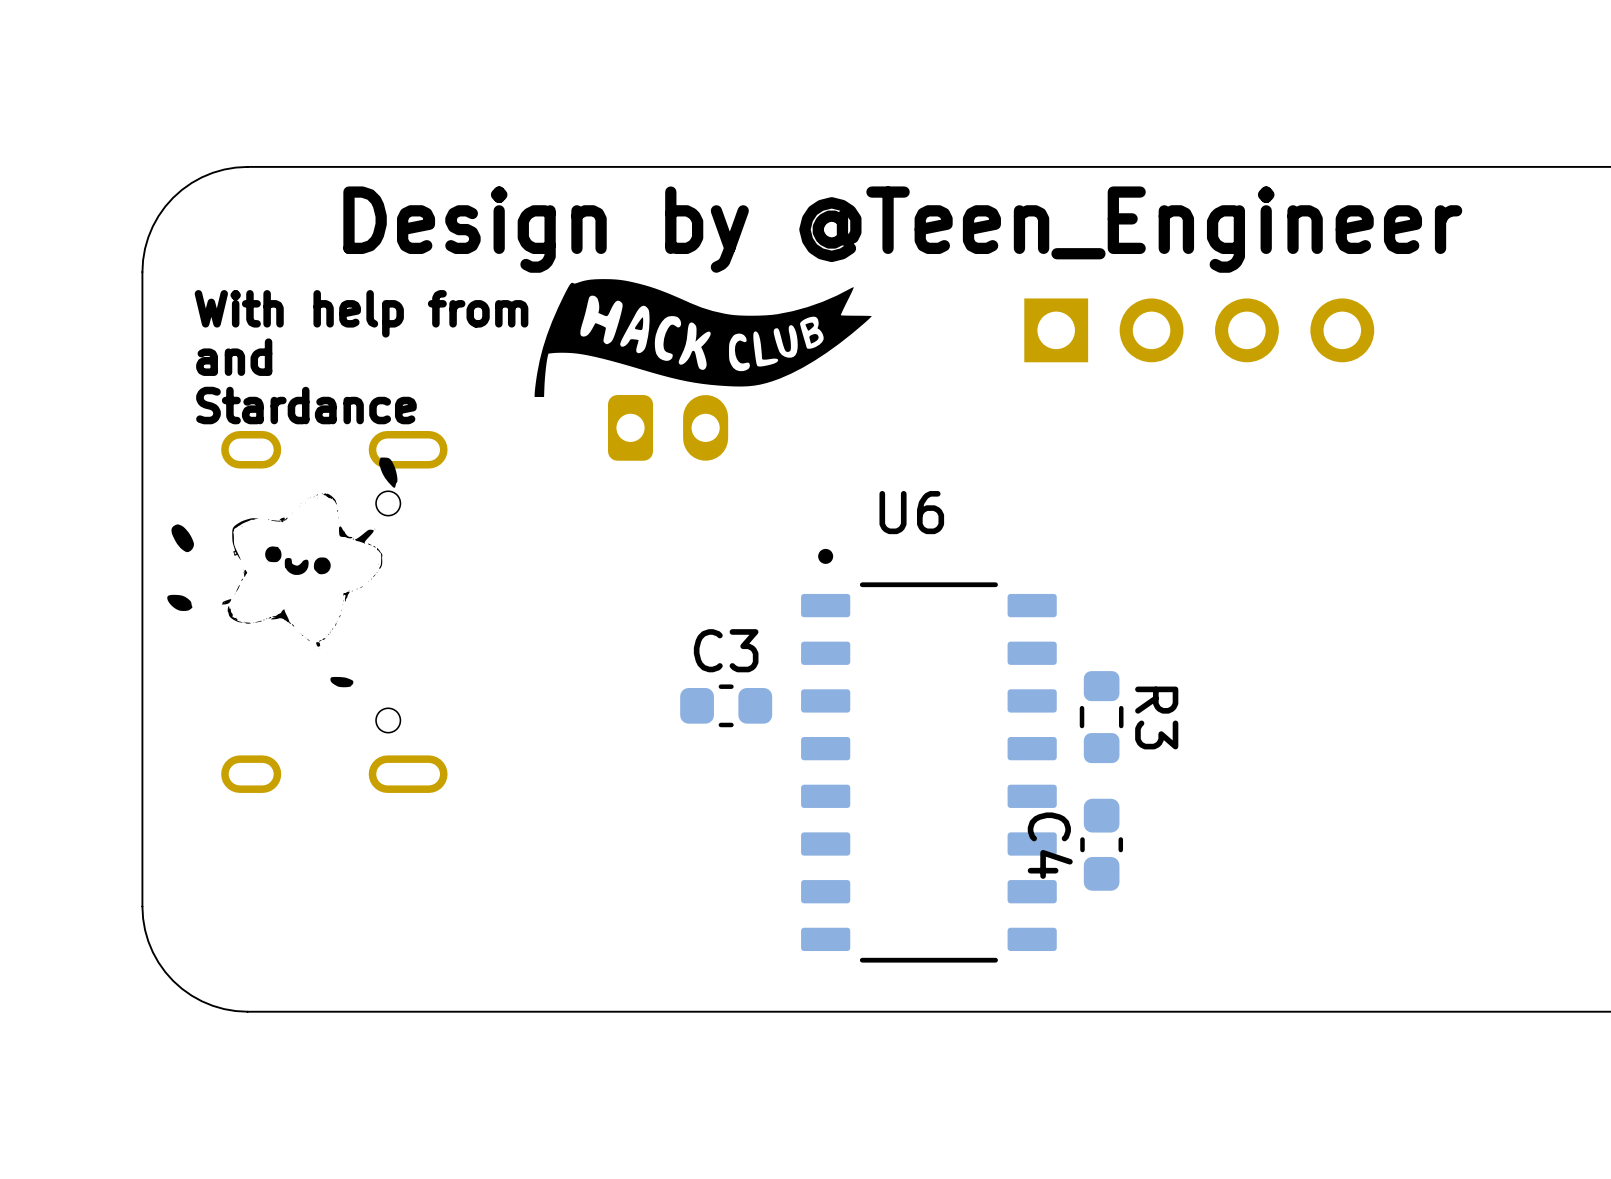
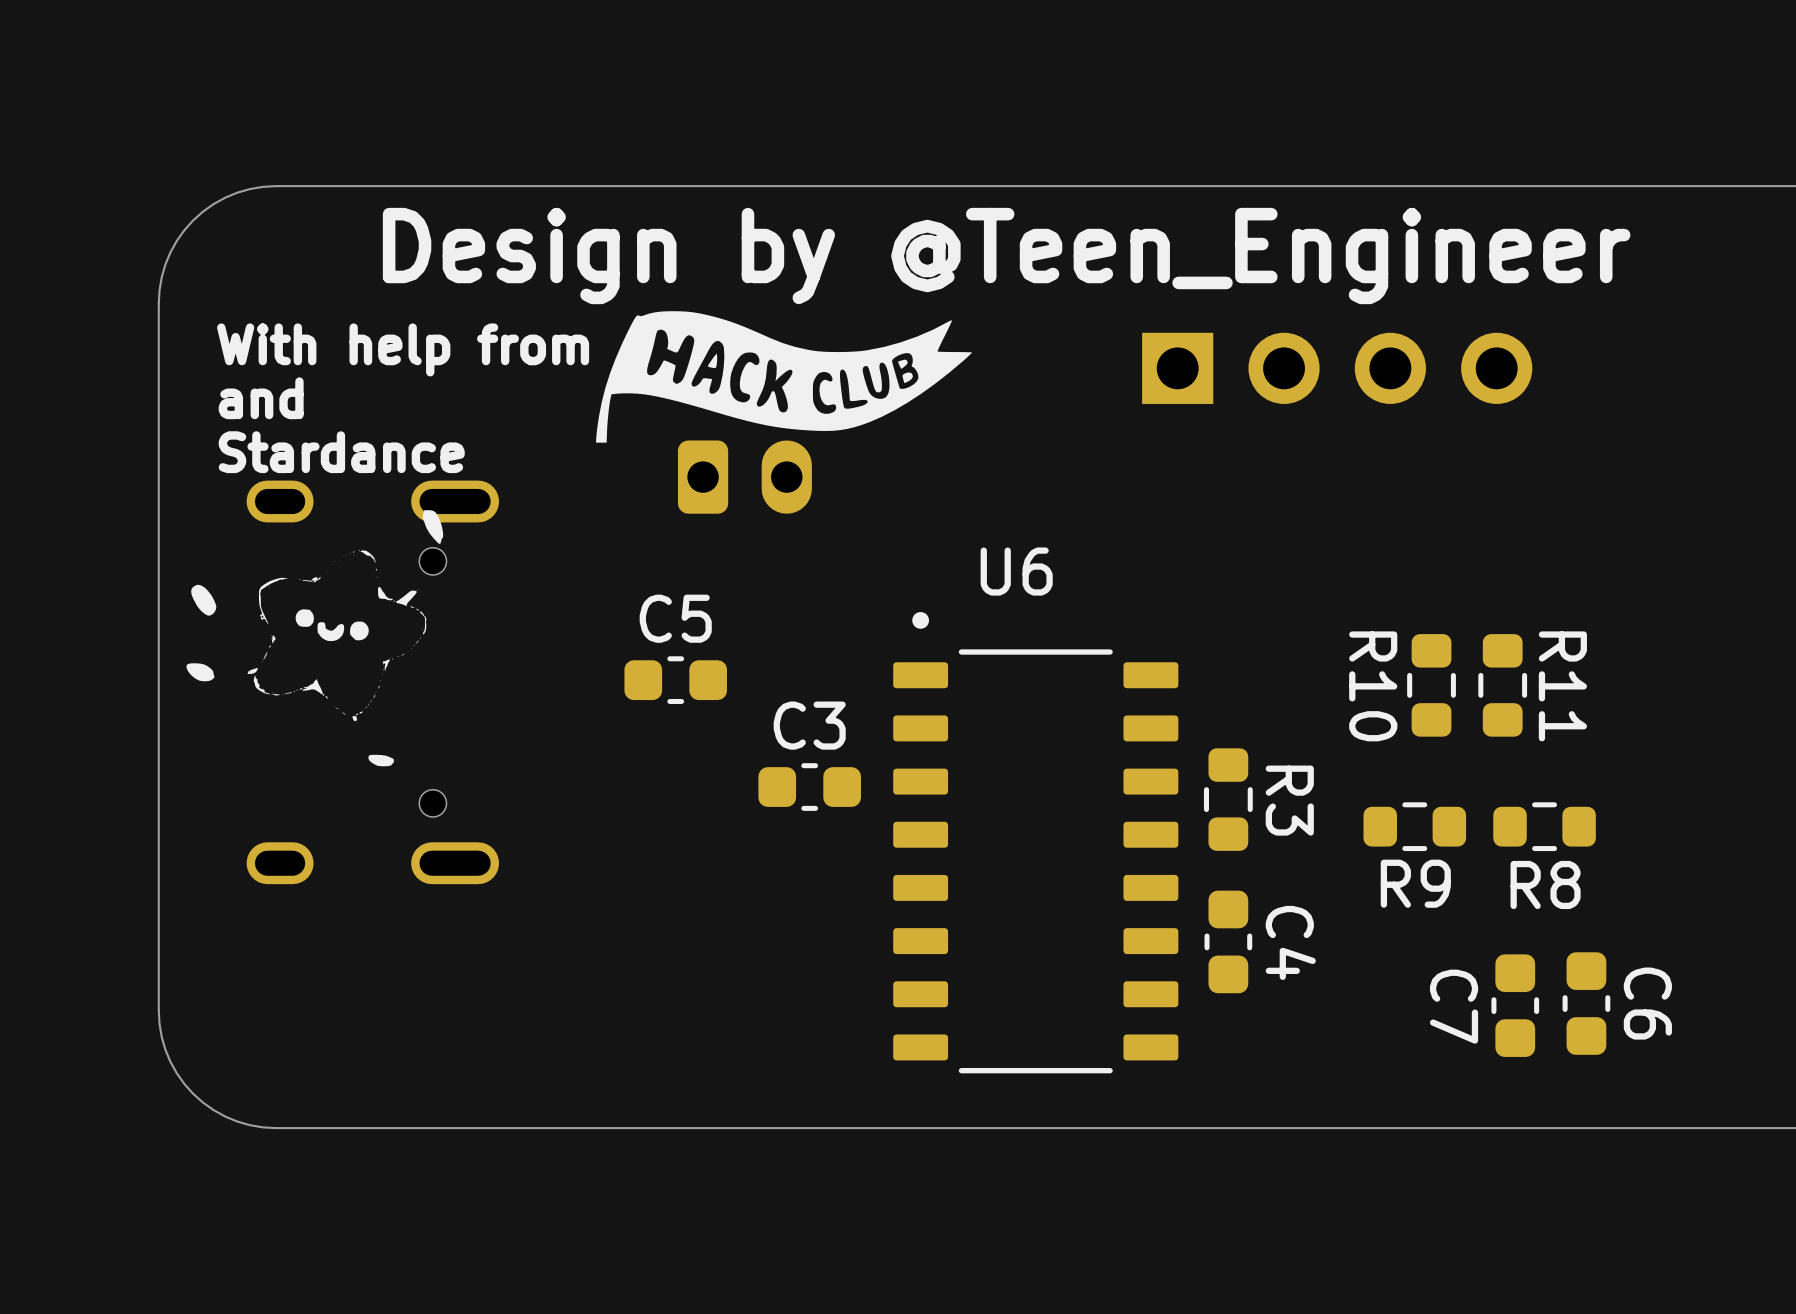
C5: none -> (675, 680)
R10: none -> (1431, 685)
R11: none -> (1502, 685)
R9: none -> (1414, 826)
R8: none -> (1544, 826)
C4 name position: C4 (1050, 845) -> C4 (1290, 942)
C6: none -> (1586, 1003)
C7: none -> (1515, 1005)

